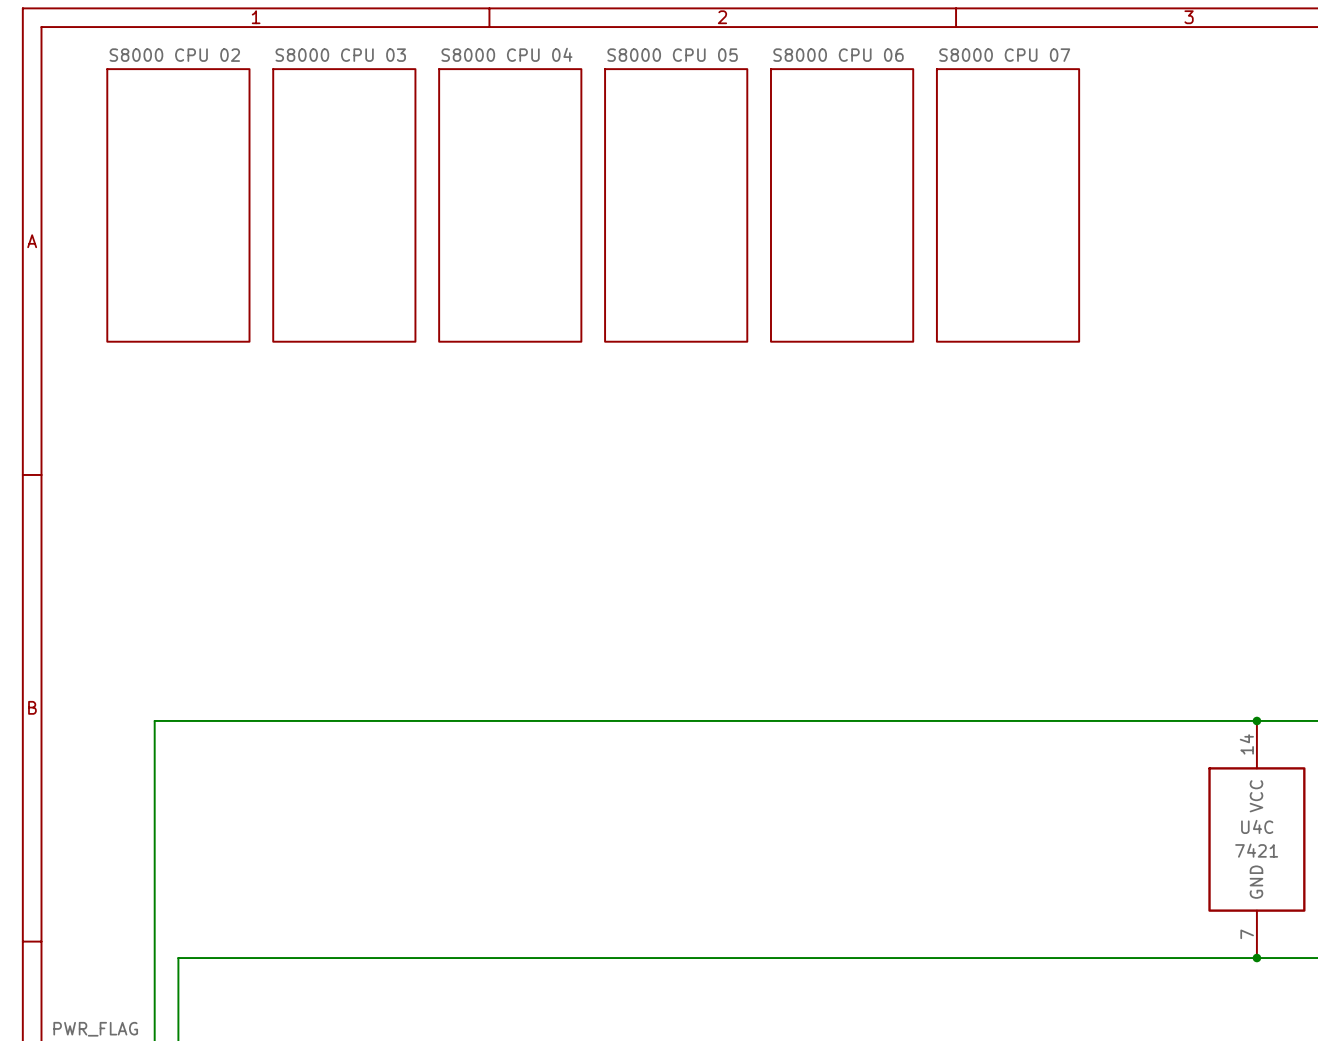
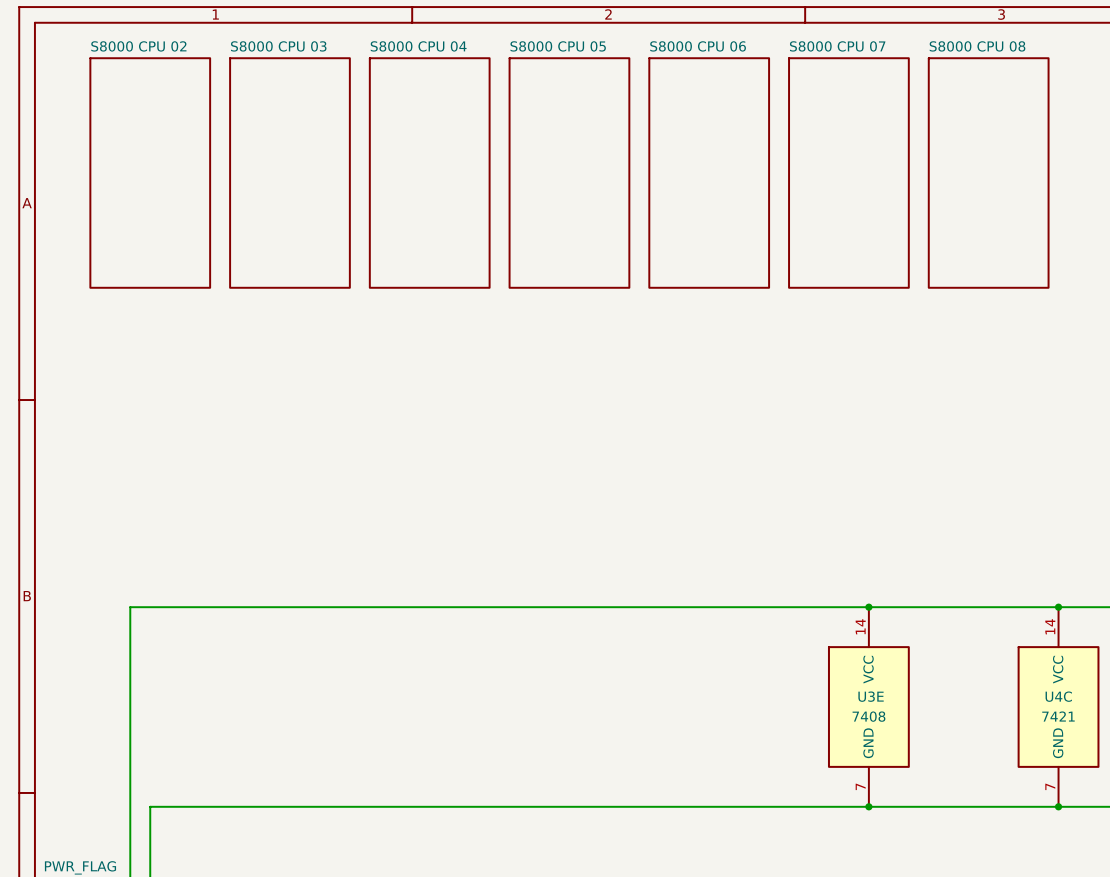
sheet S8000 CPU 08: none -> (988, 173)
junction: none -> (868, 607)
U3E: none -> 7408 (868, 707)
junction: none -> (868, 806)

